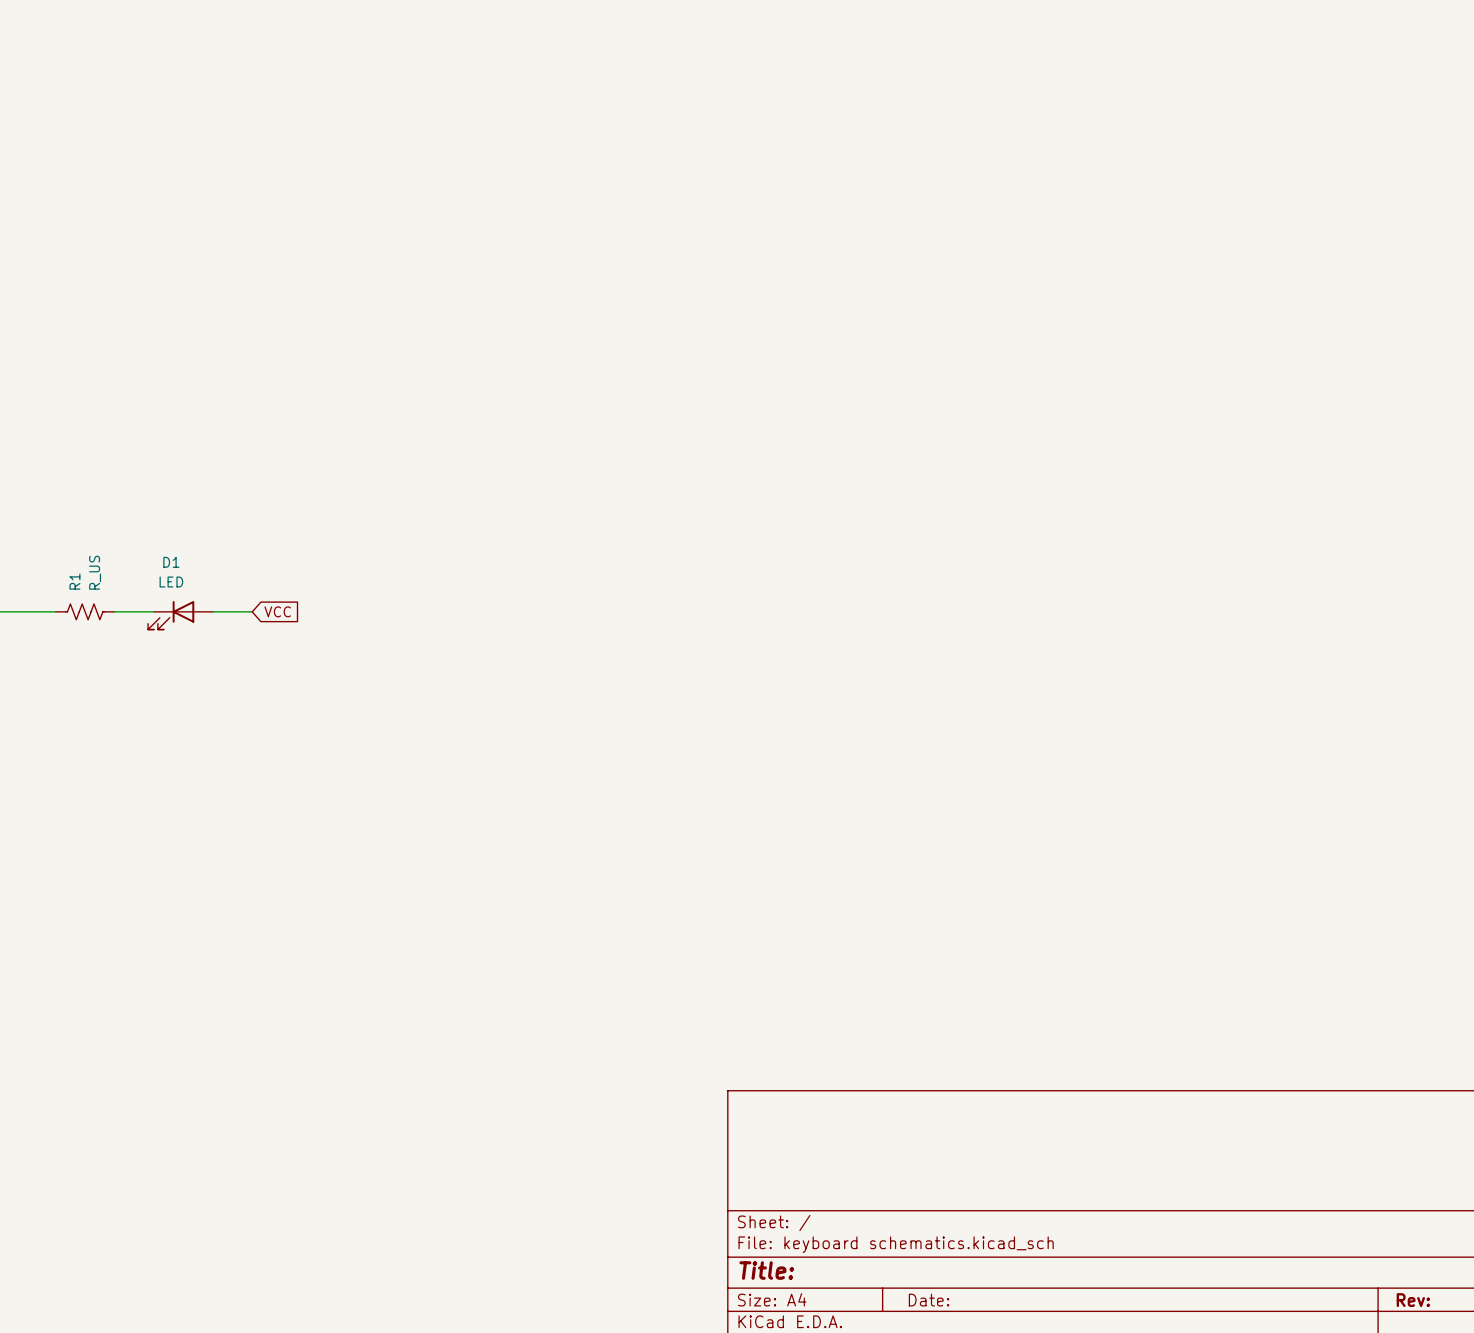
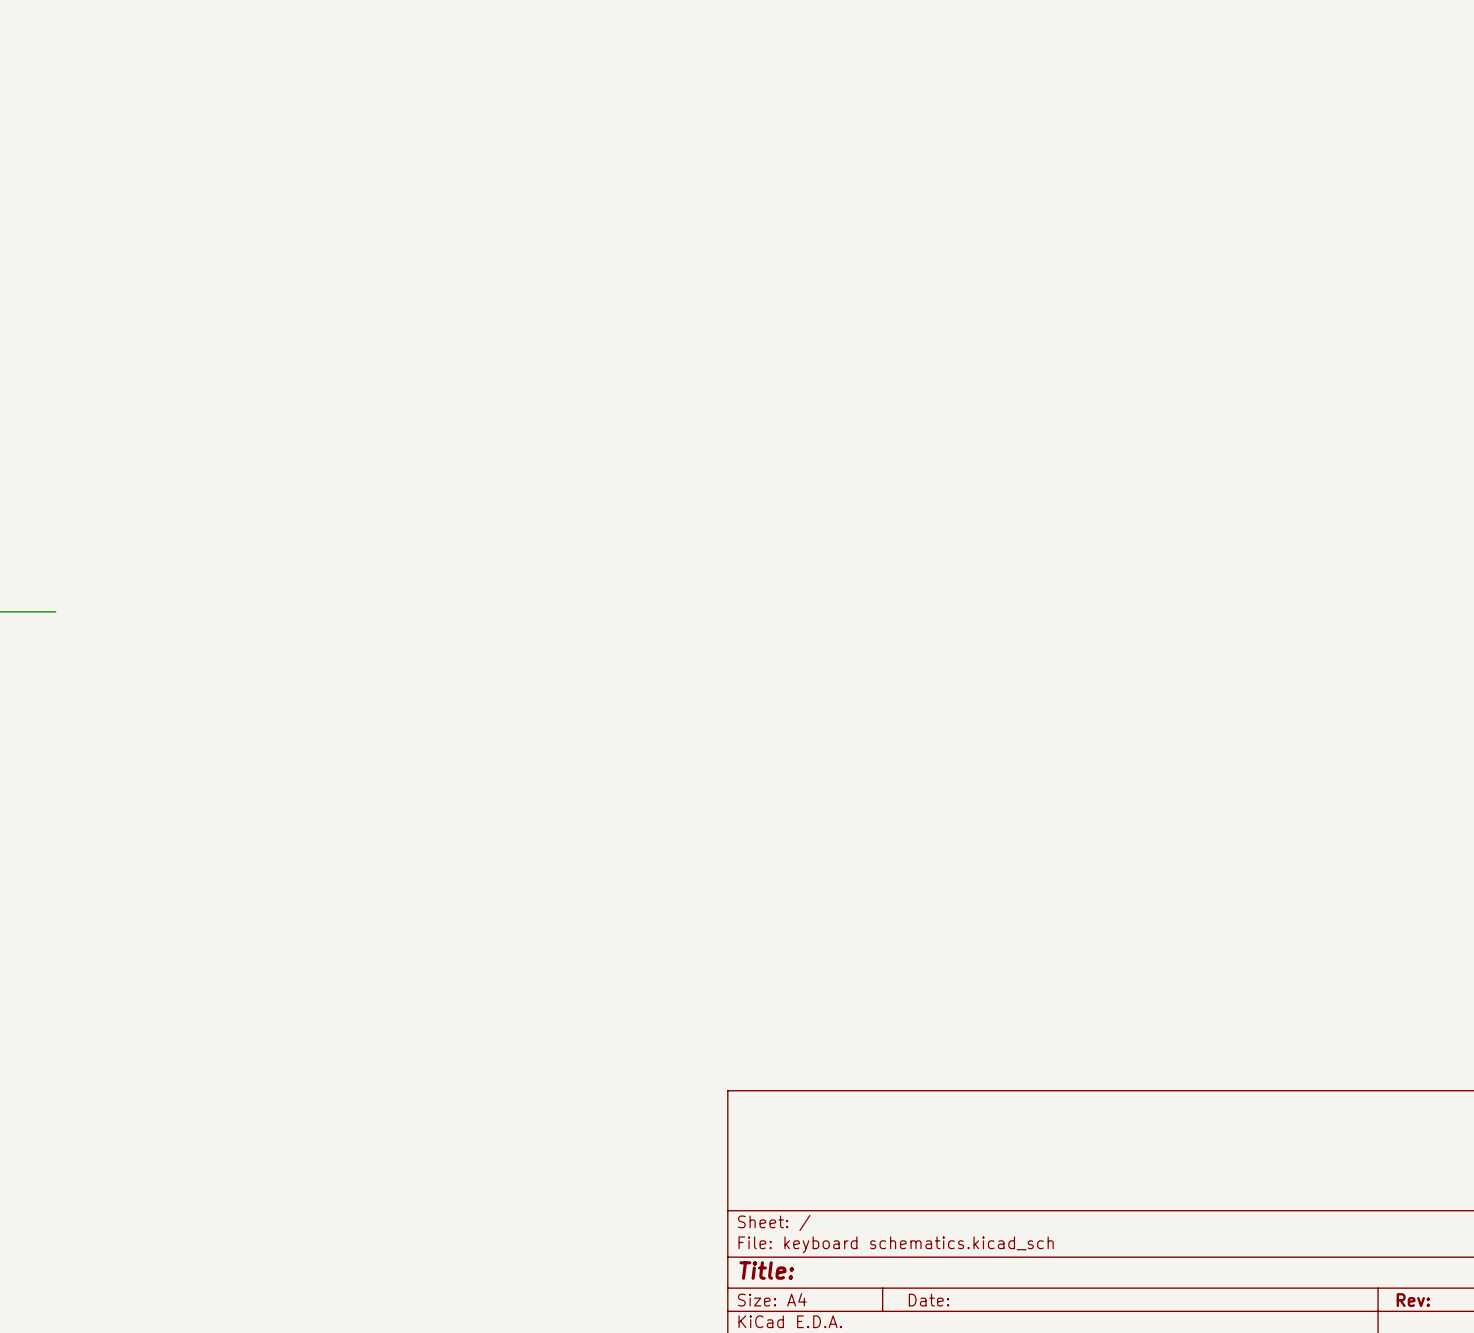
R1: R_US (85, 611) -> none
wire: (114, 611) (153, 611) -> none
wire: (212, 611) (252, 611) -> none
global label: VCC (277, 611) -> none
D1: LED (180, 615) -> none

